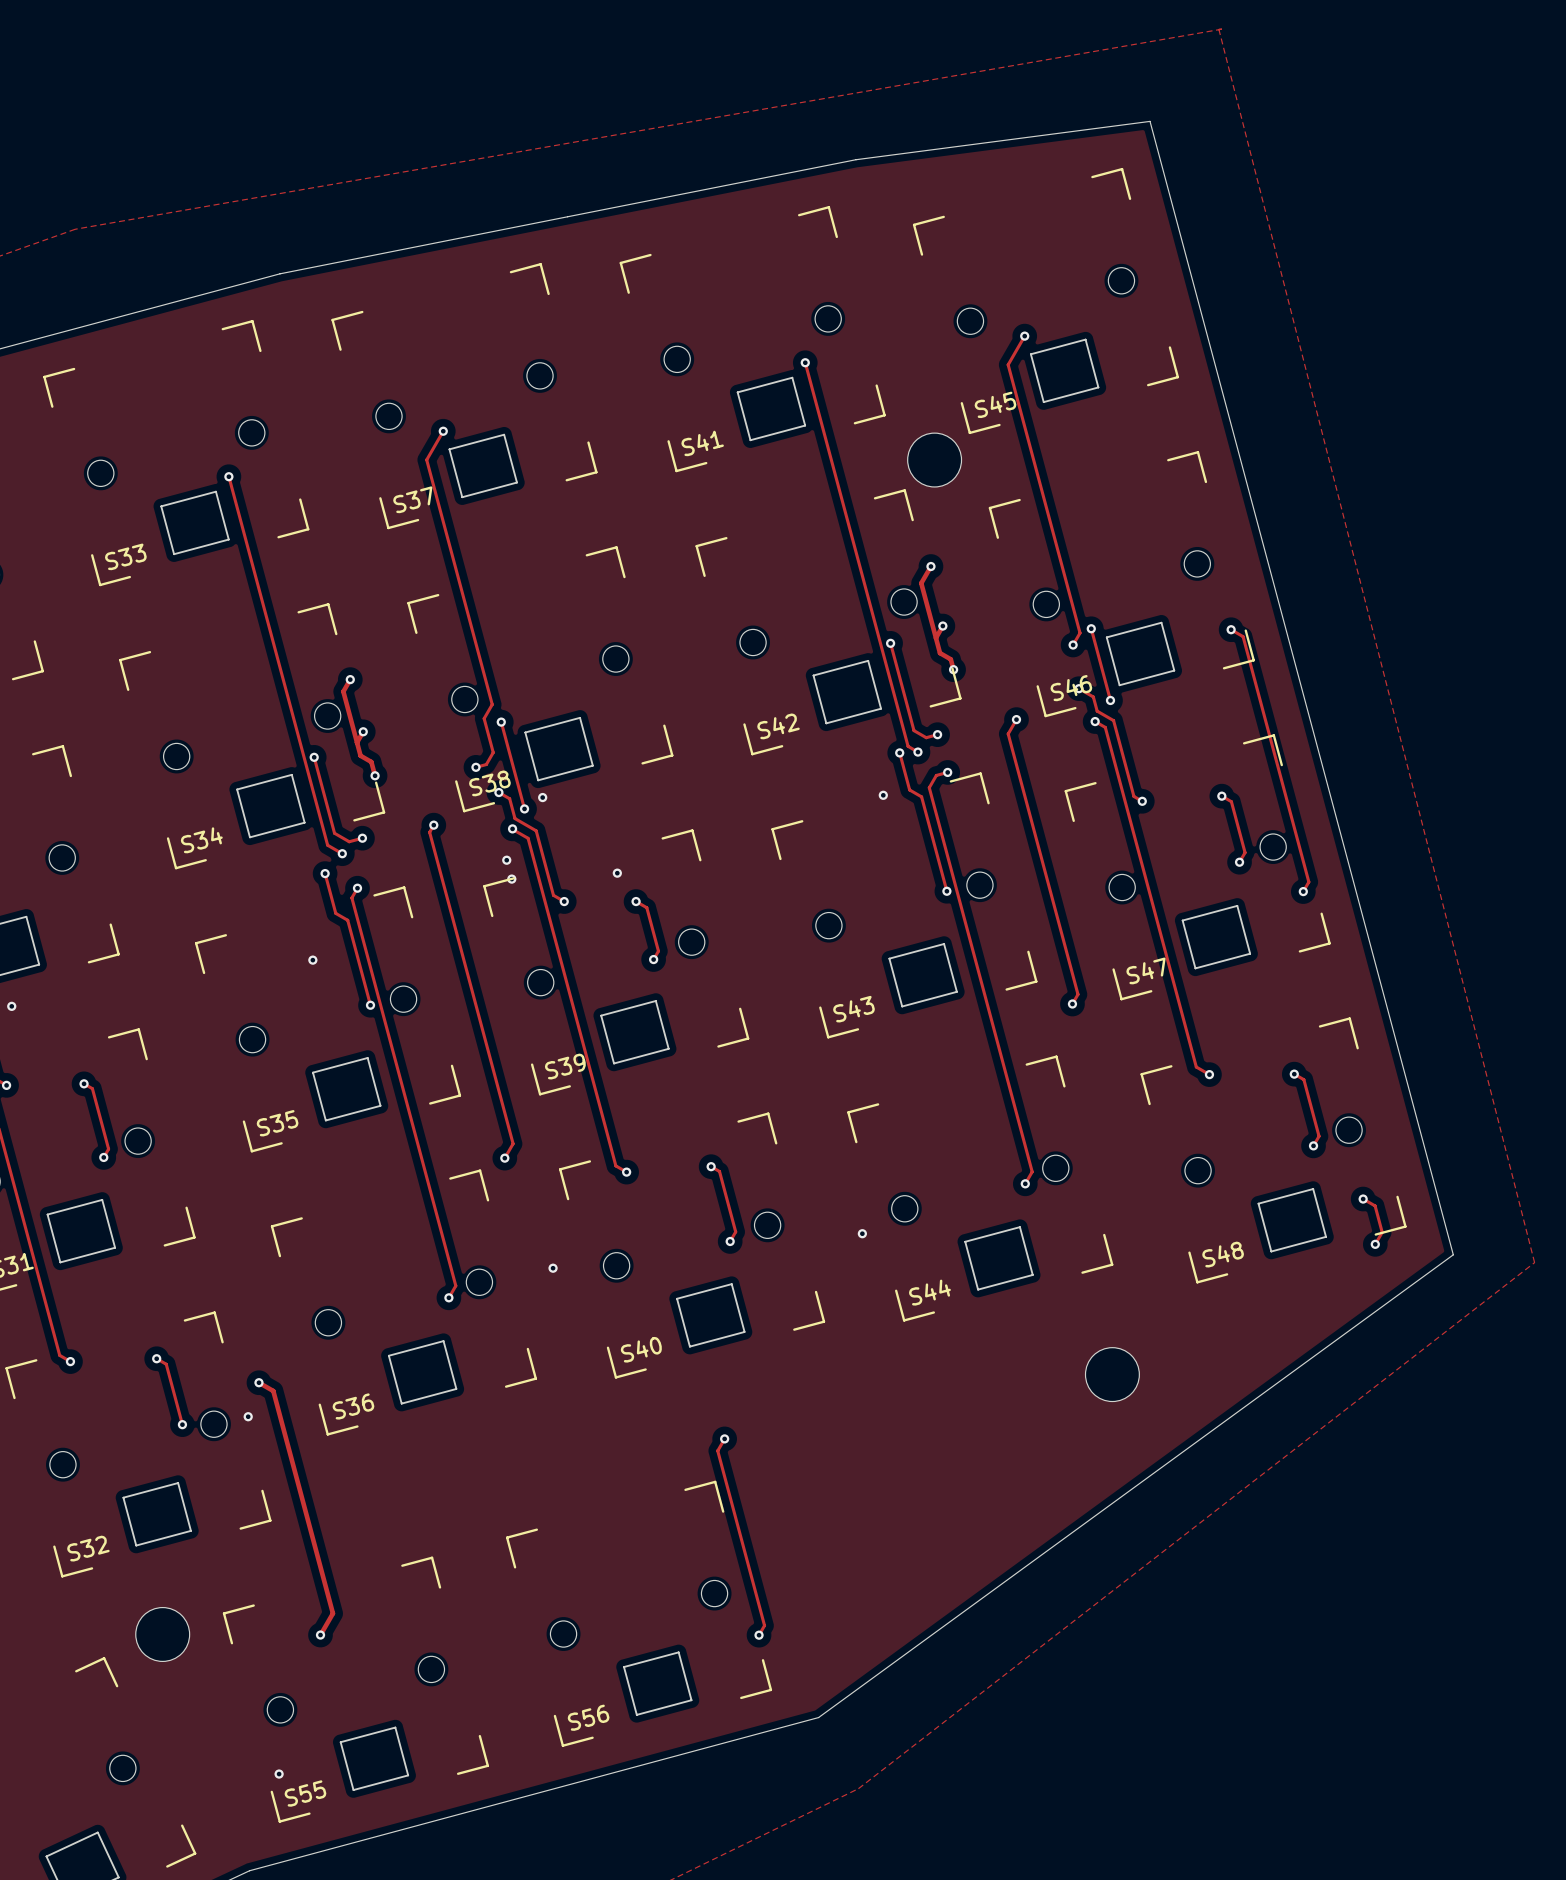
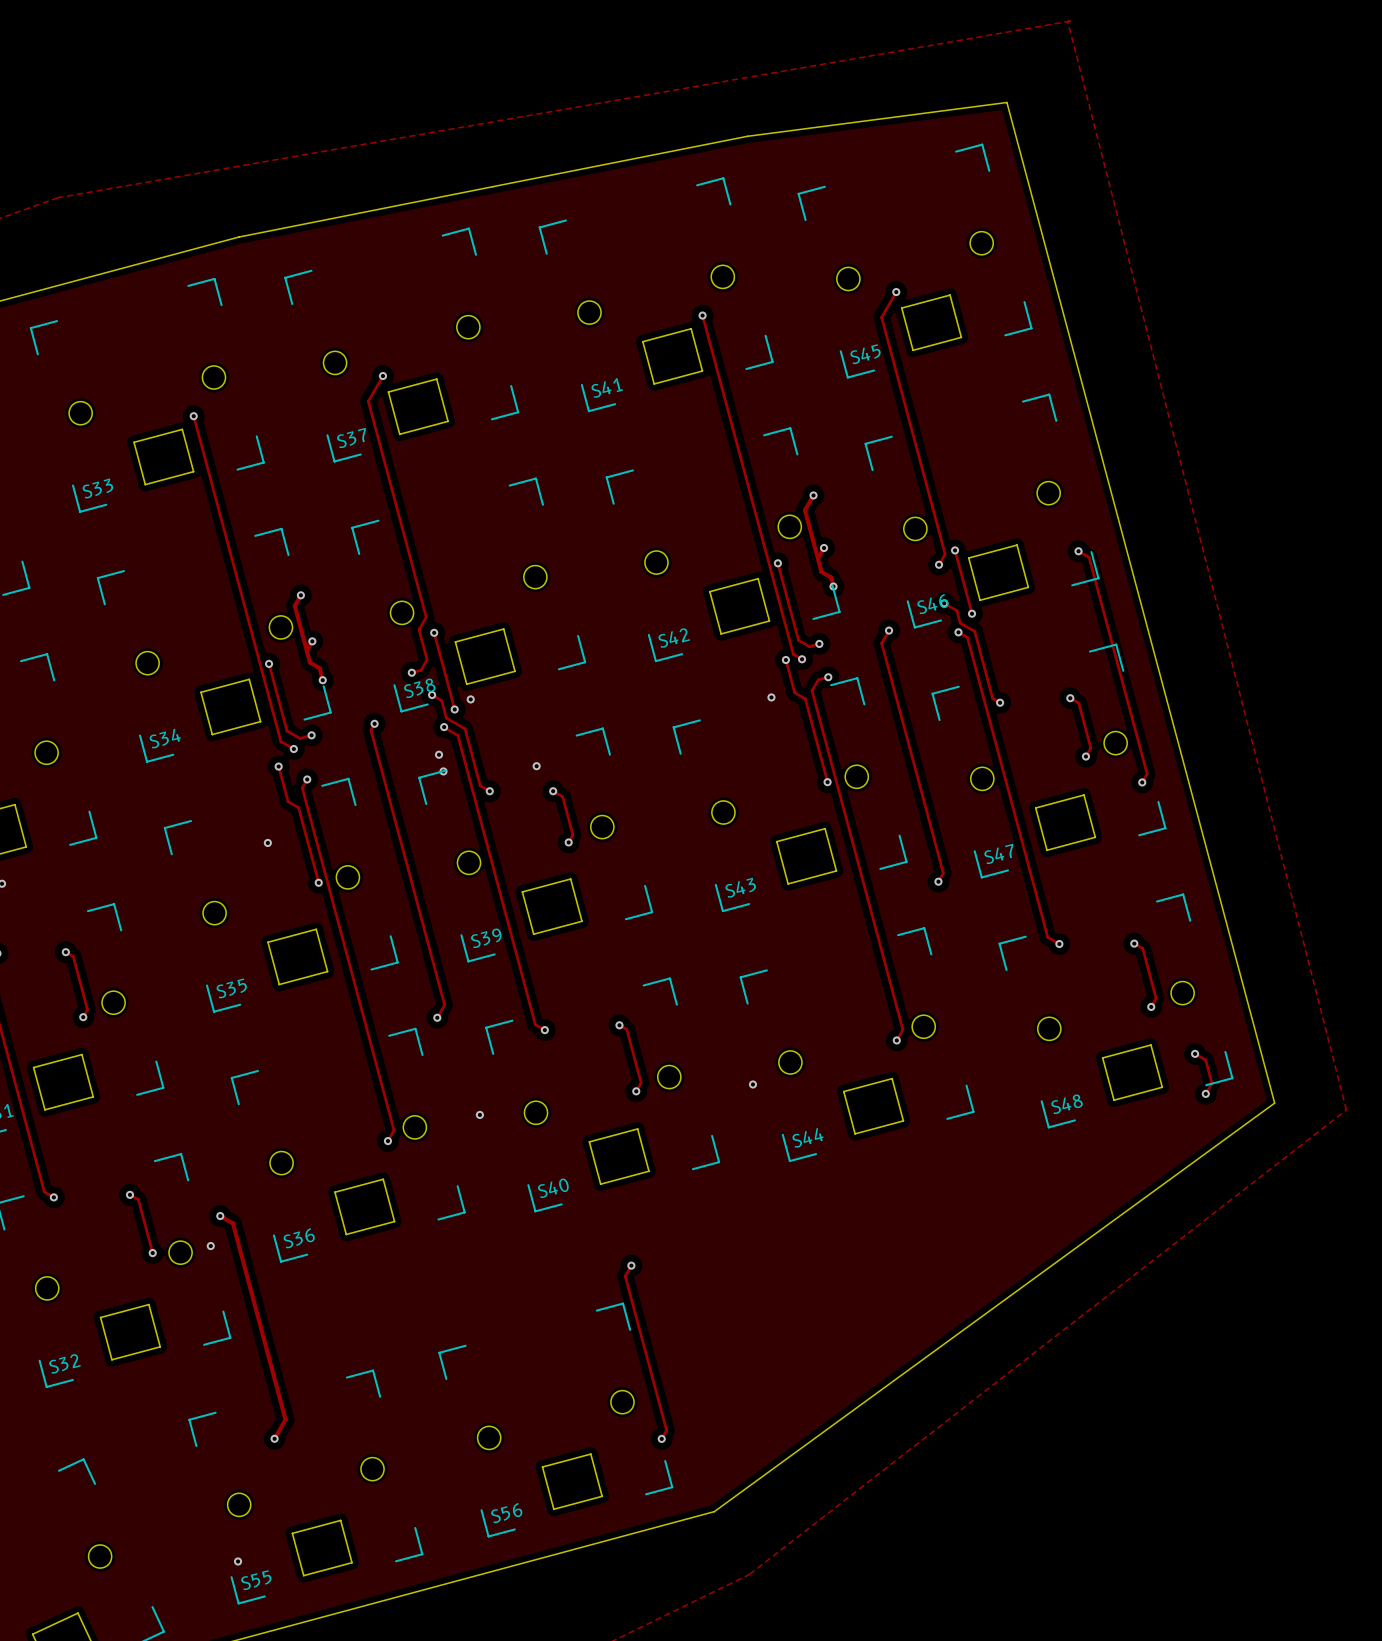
part: (934, 460) -> none
part: (1112, 1374) -> none
part: (162, 1634) -> none

